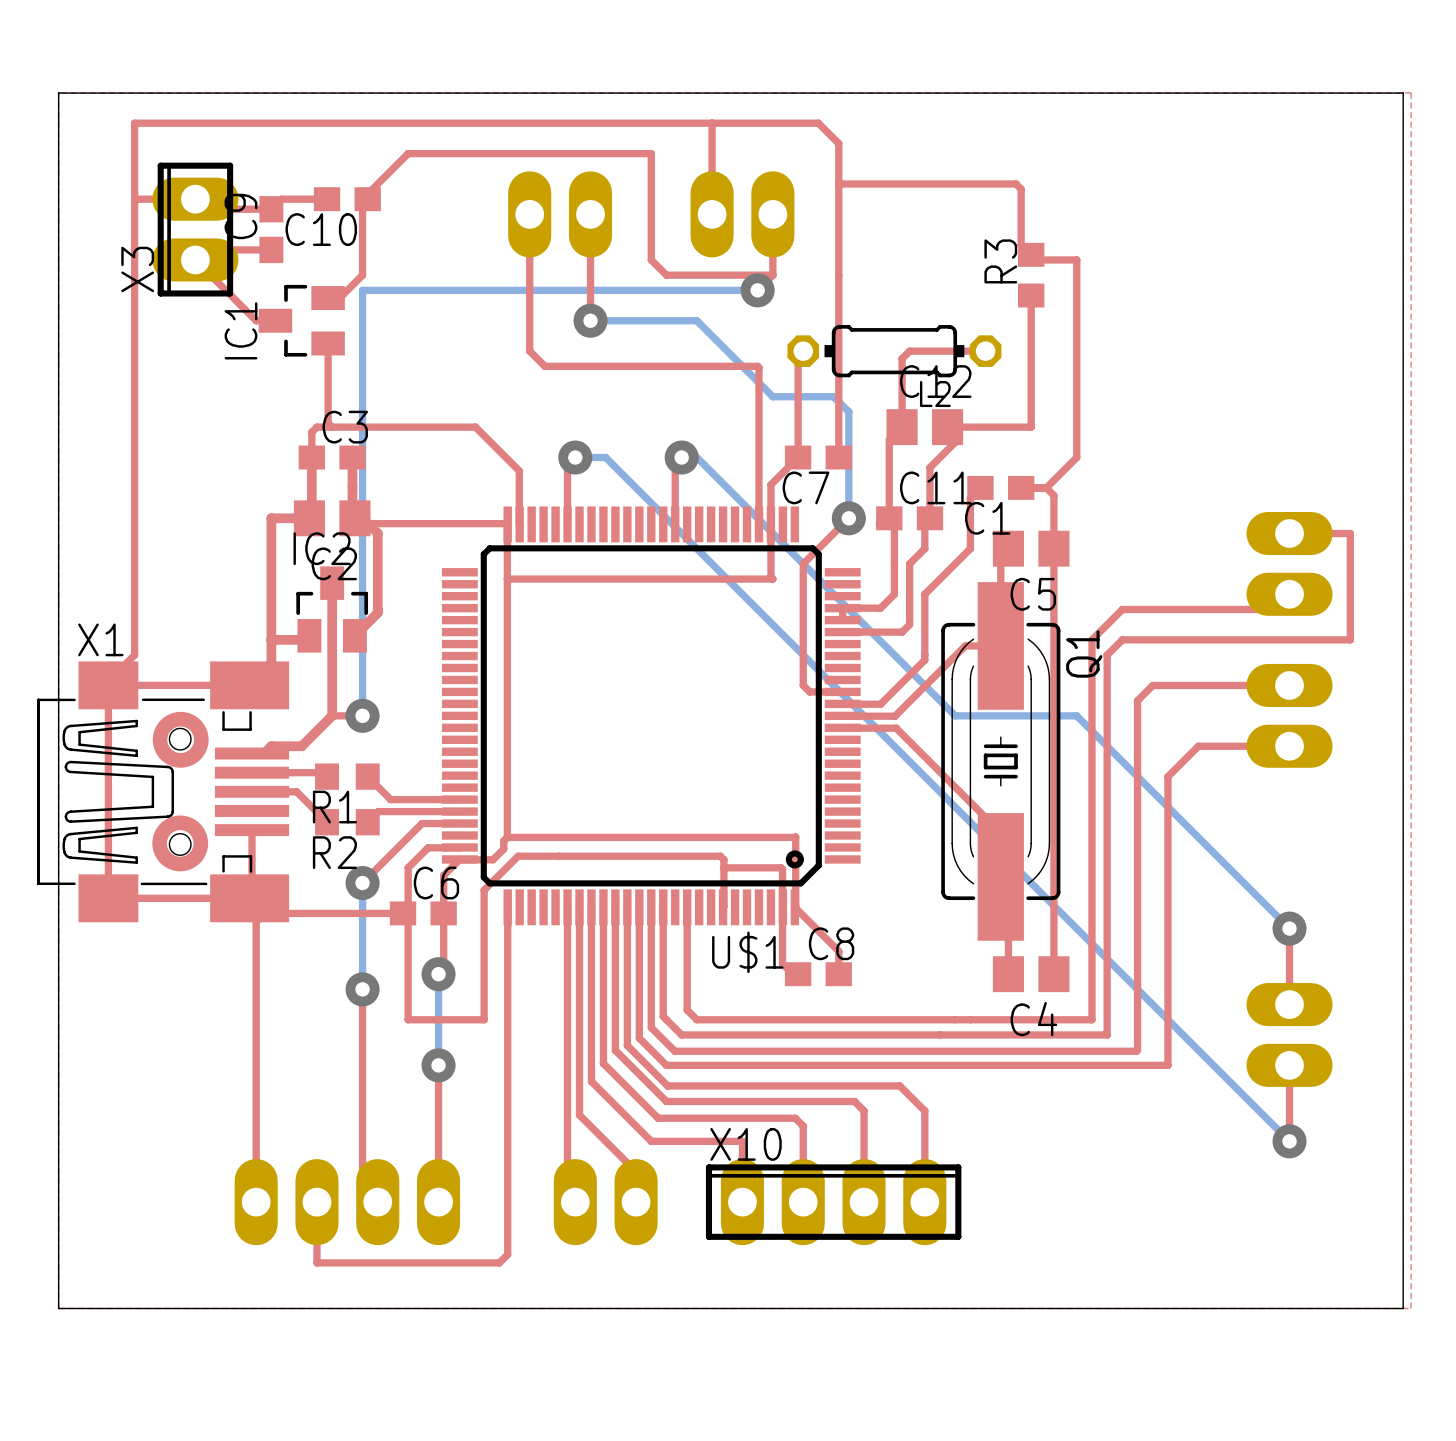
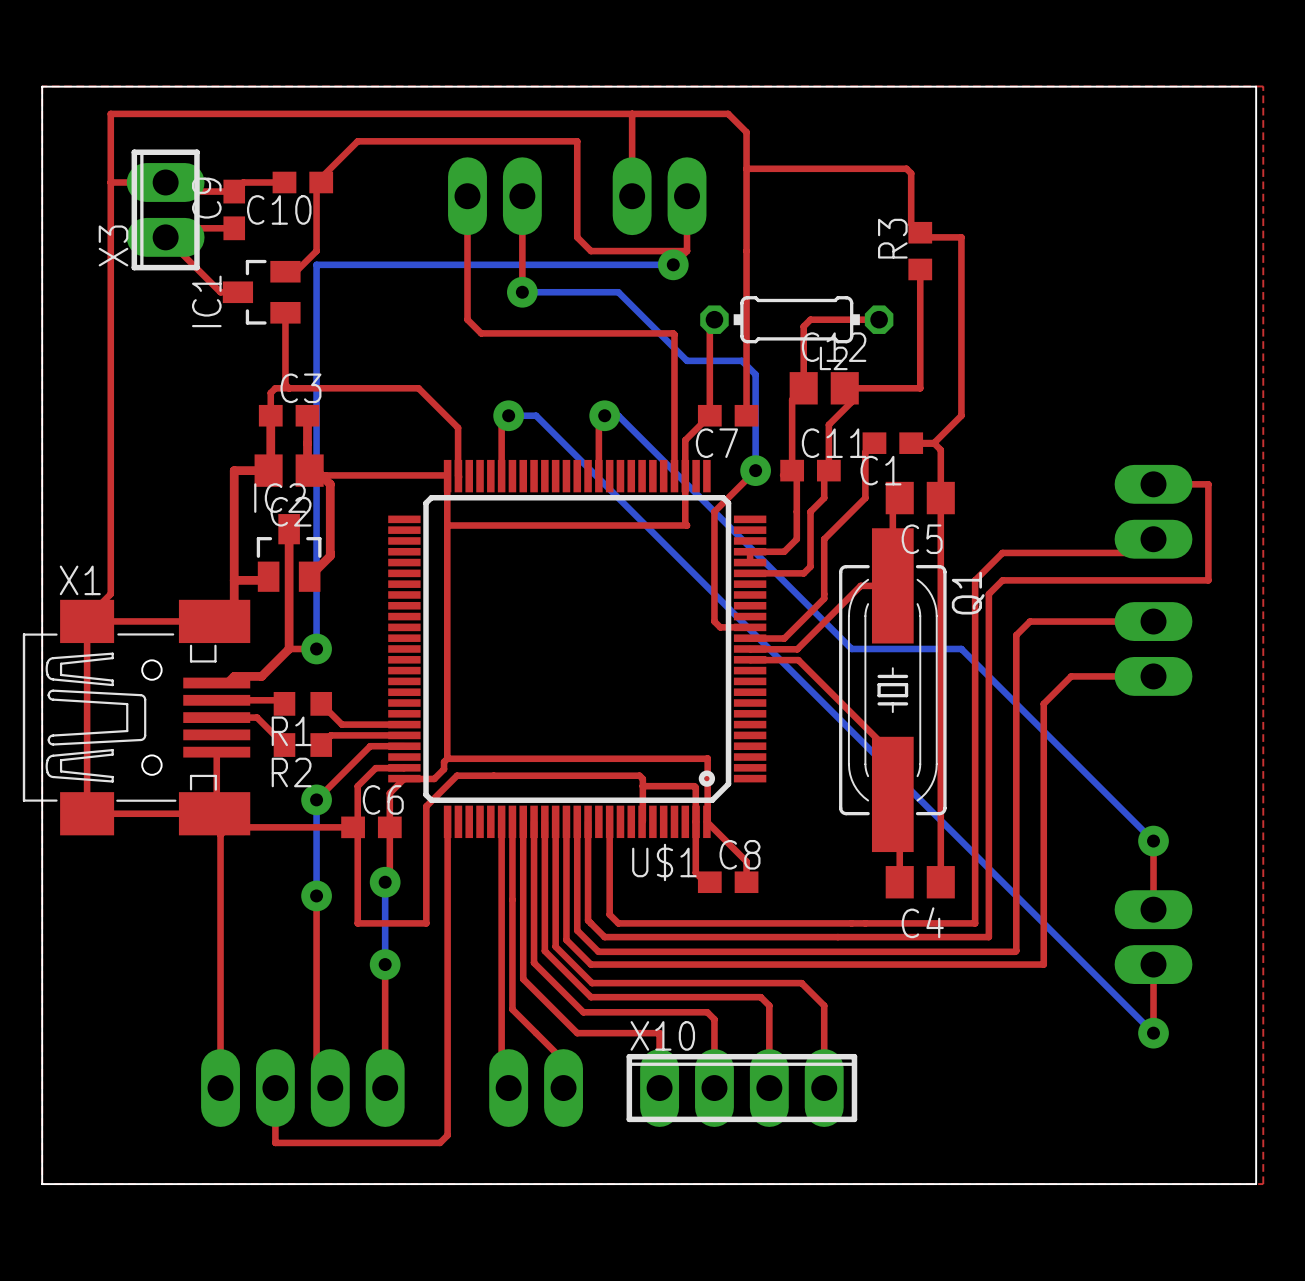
drawing: [152, 711, 209, 768] -> none
drawing: [152, 815, 209, 872] -> none

